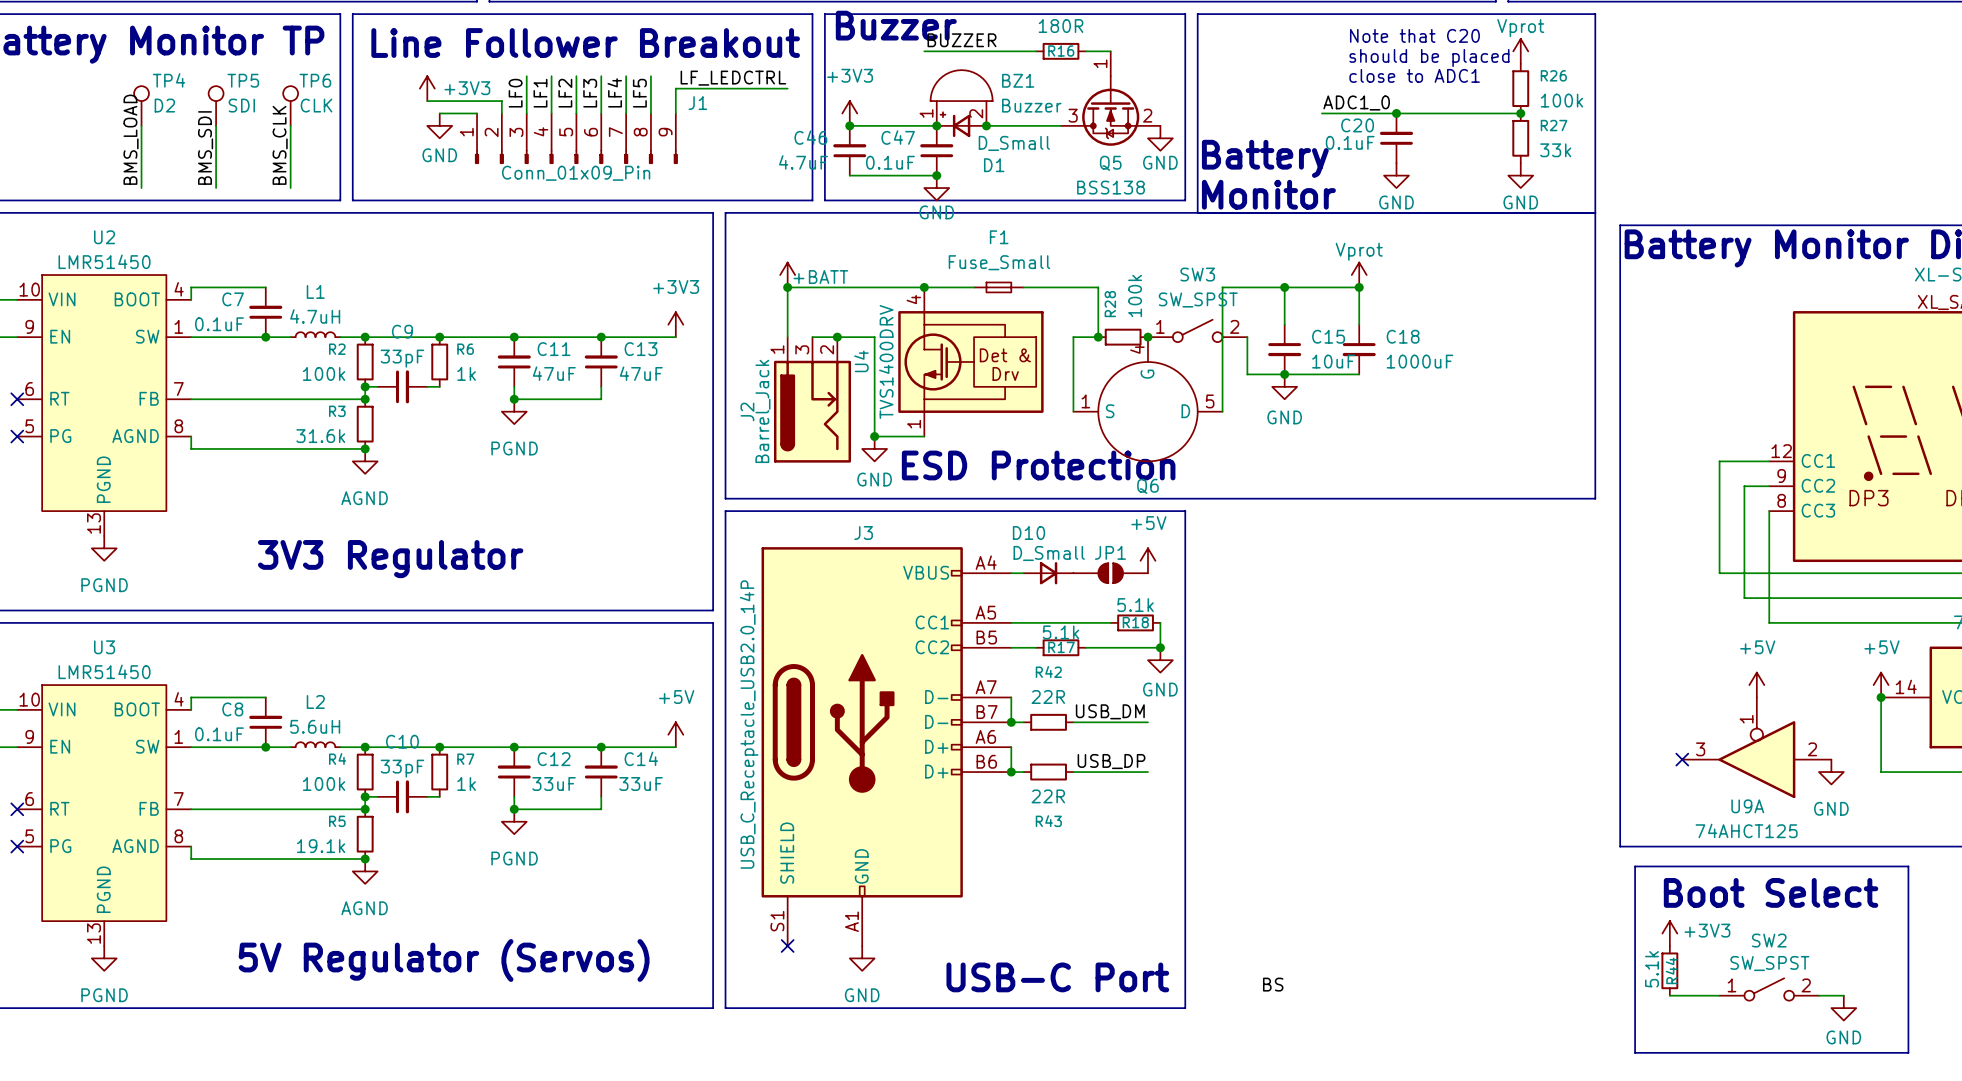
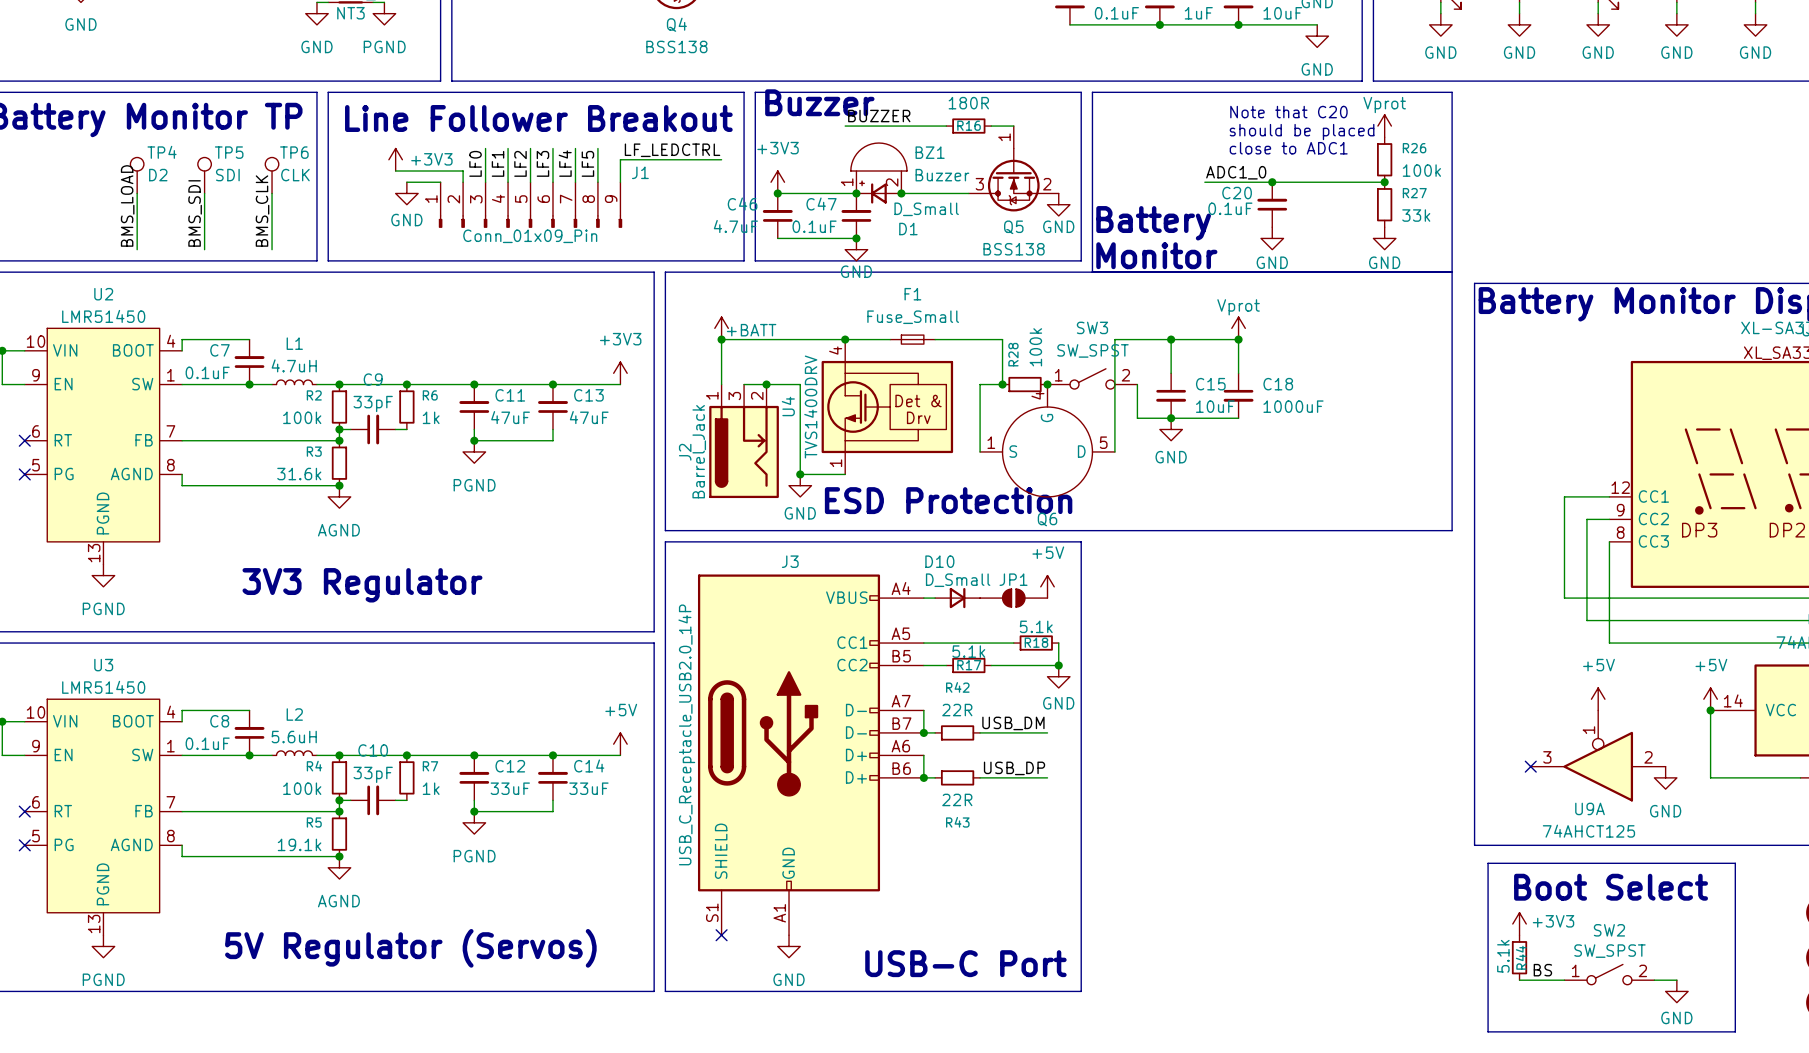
label: BS (1273, 984) -> none
label: none -> BS (1542, 970)

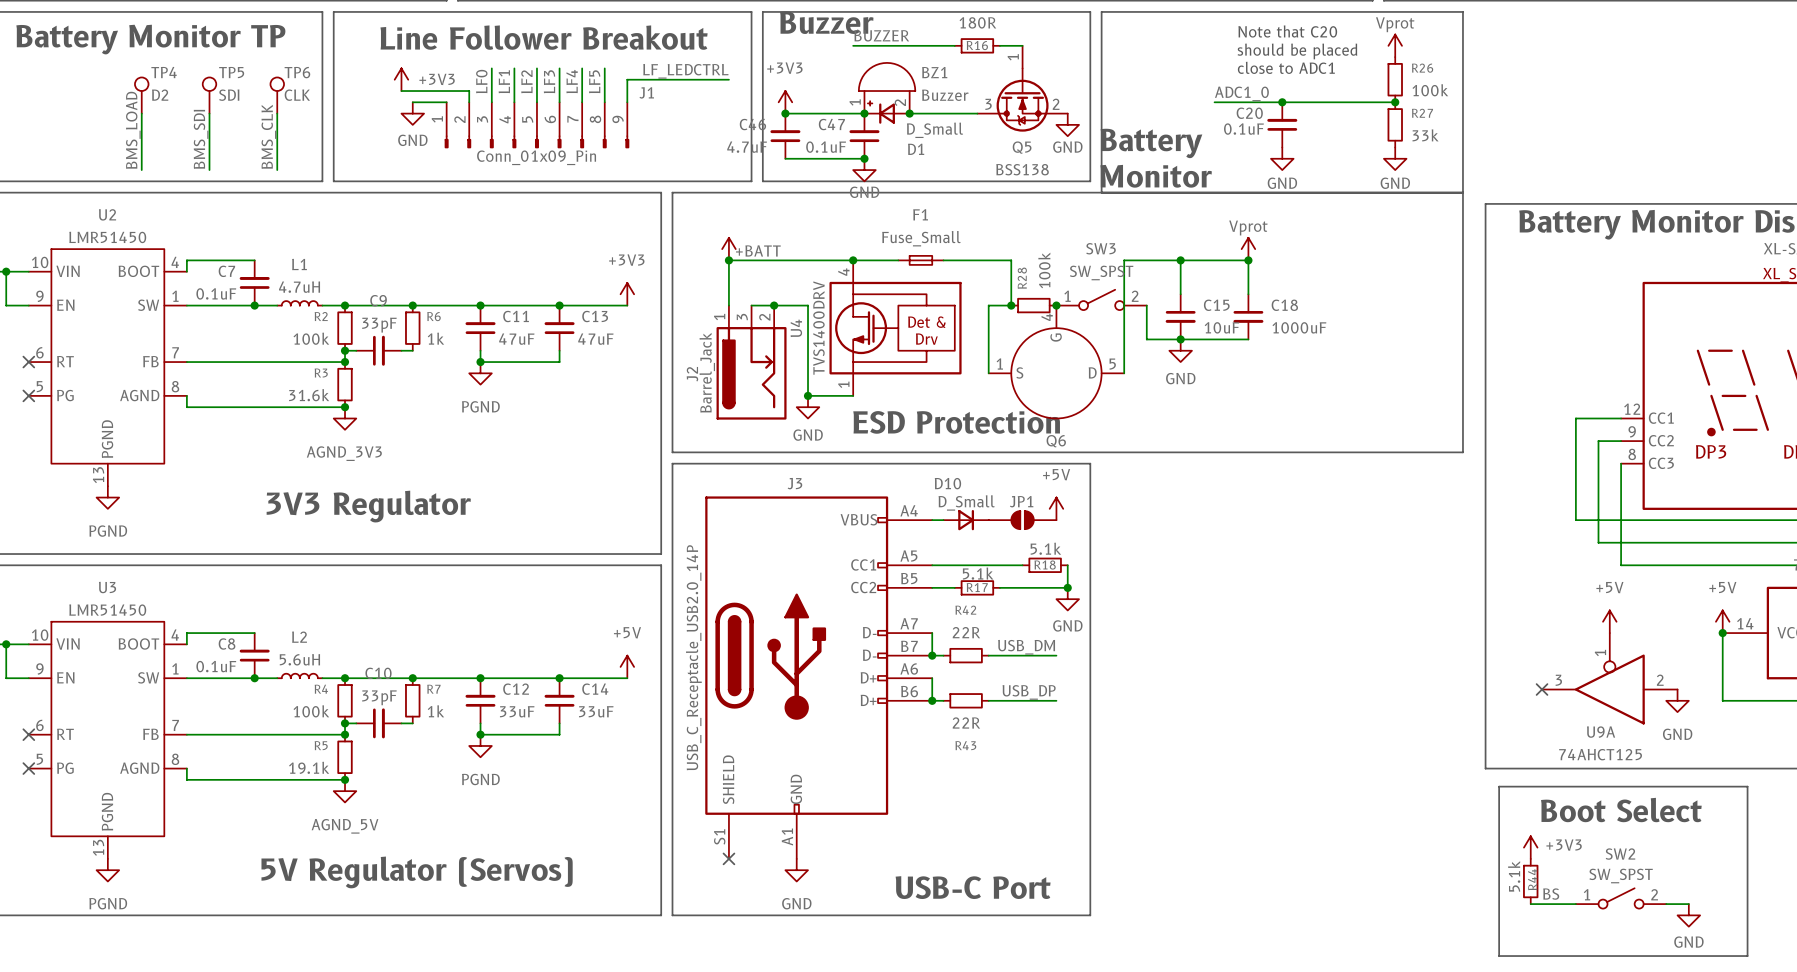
power symbol: AGND (339, 496) -> AGND_3V3 (345, 418)
power symbol: AGND (339, 867) -> AGND_5V (345, 791)

